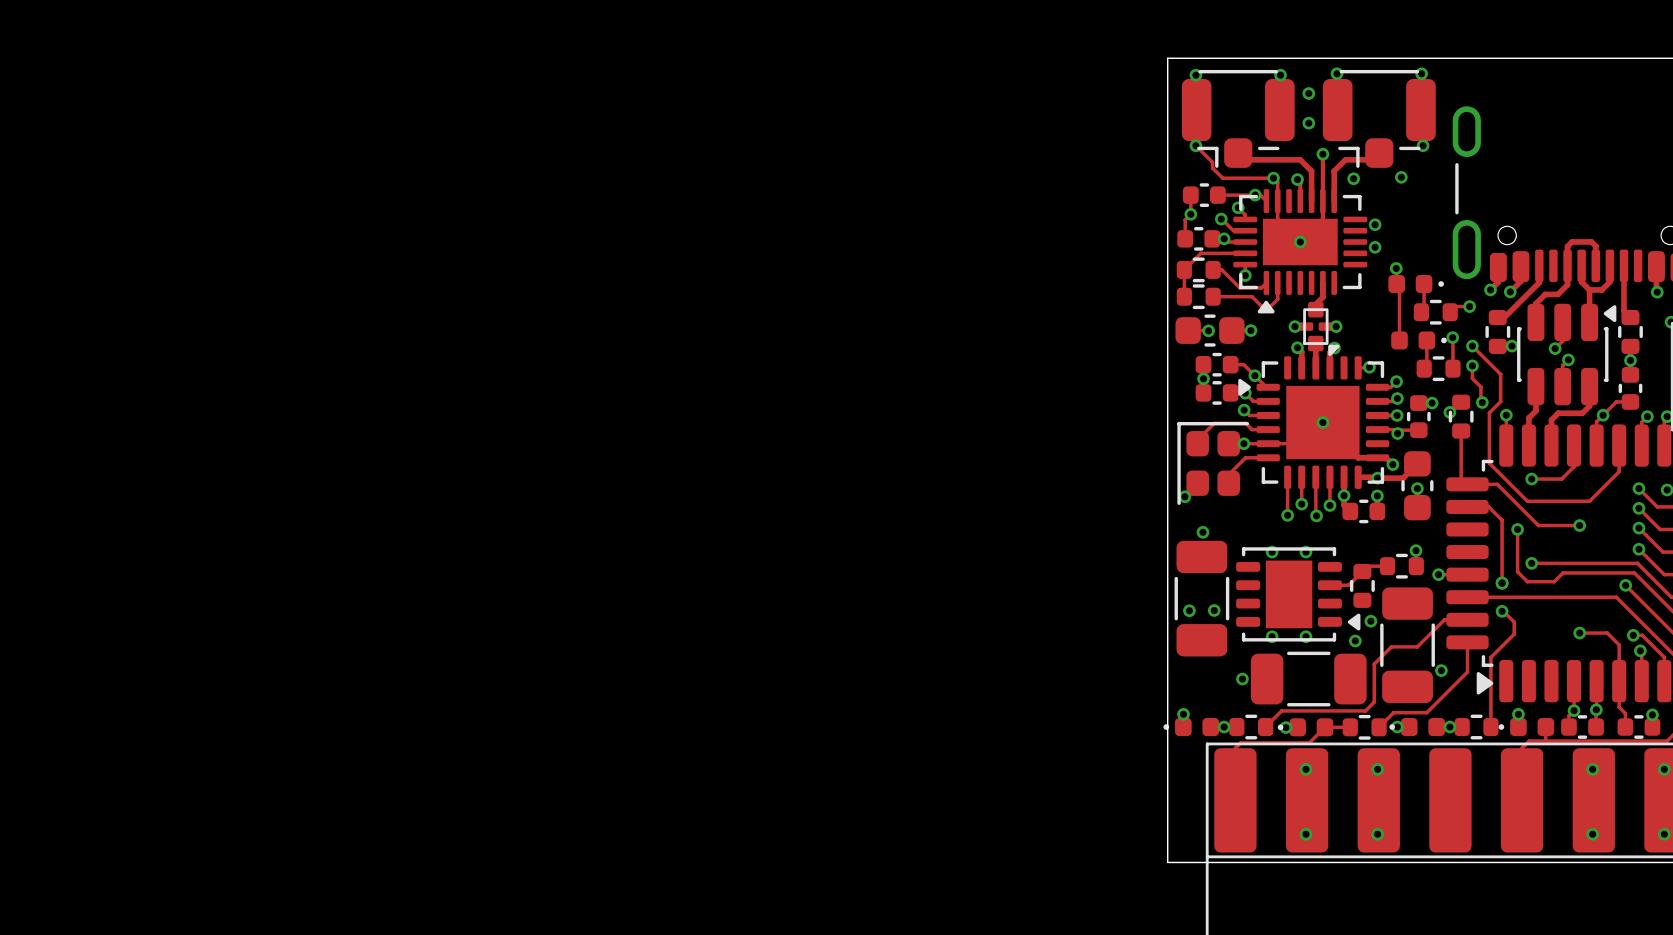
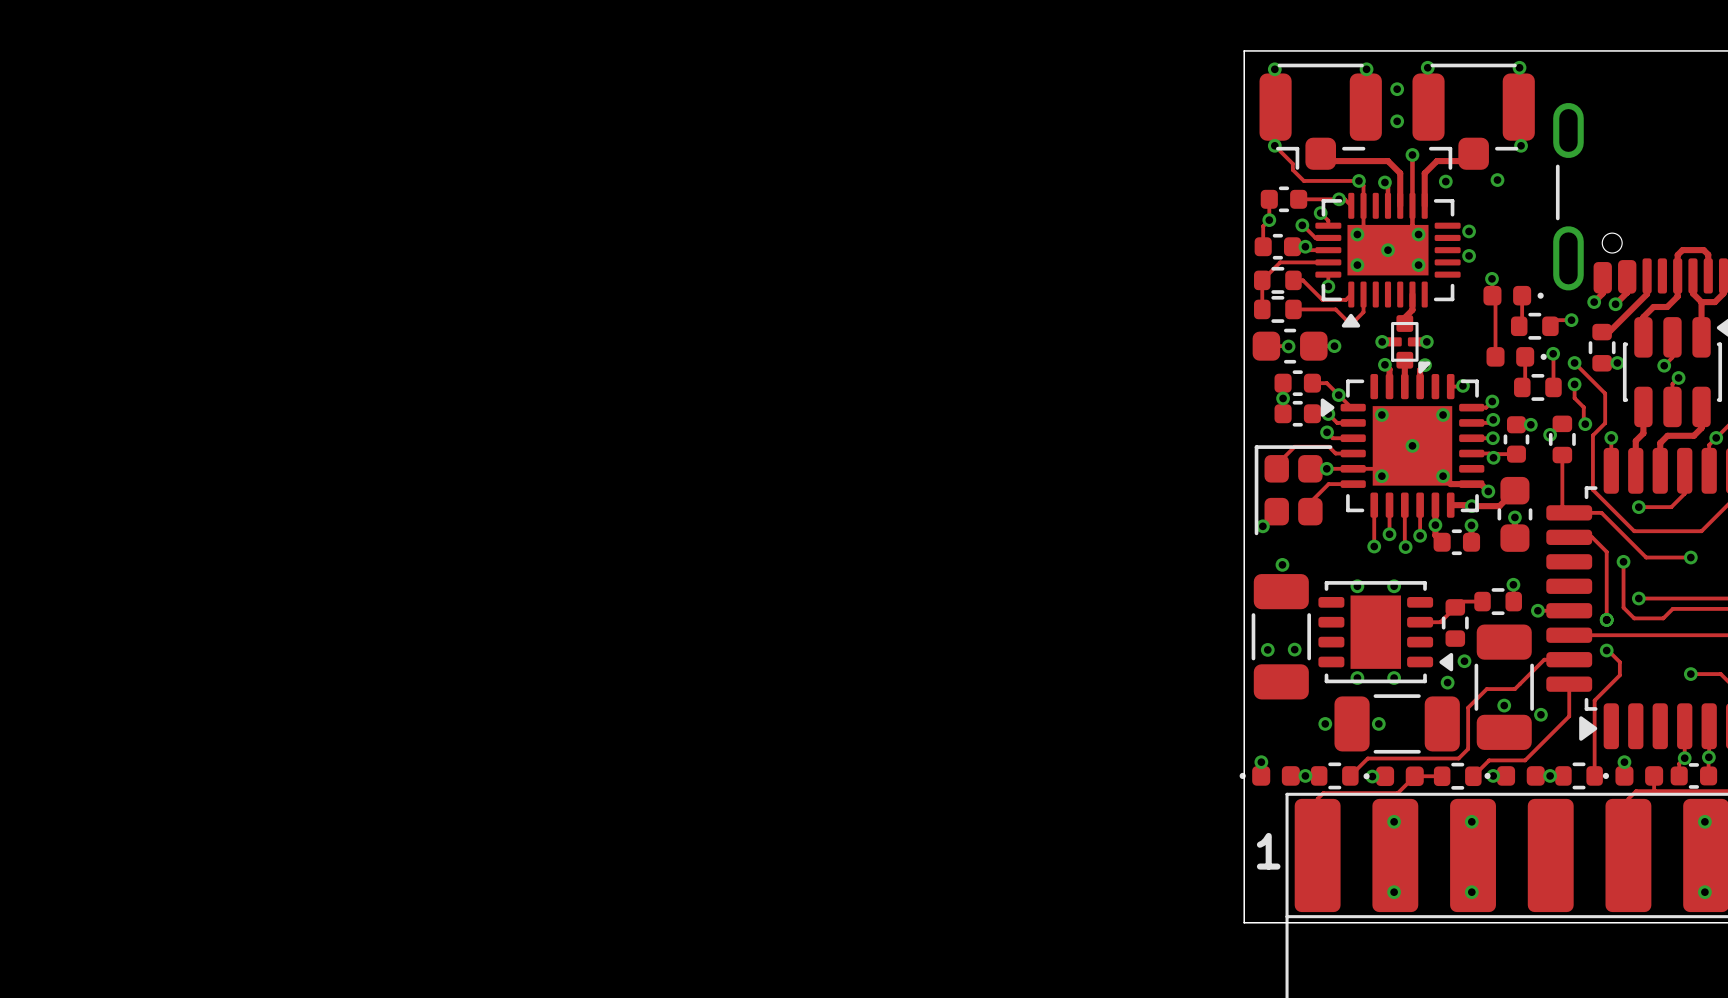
via: none -> (1357, 234)
via: none -> (1418, 234)
via: none -> (1357, 265)
via: none -> (1418, 265)
via: none -> (1381, 414)
via: none -> (1443, 414)
via: none -> (1381, 476)
via: none -> (1443, 476)
via: none -> (1504, 705)
via: none -> (1378, 723)
text: none -> 1 (1268, 851)

